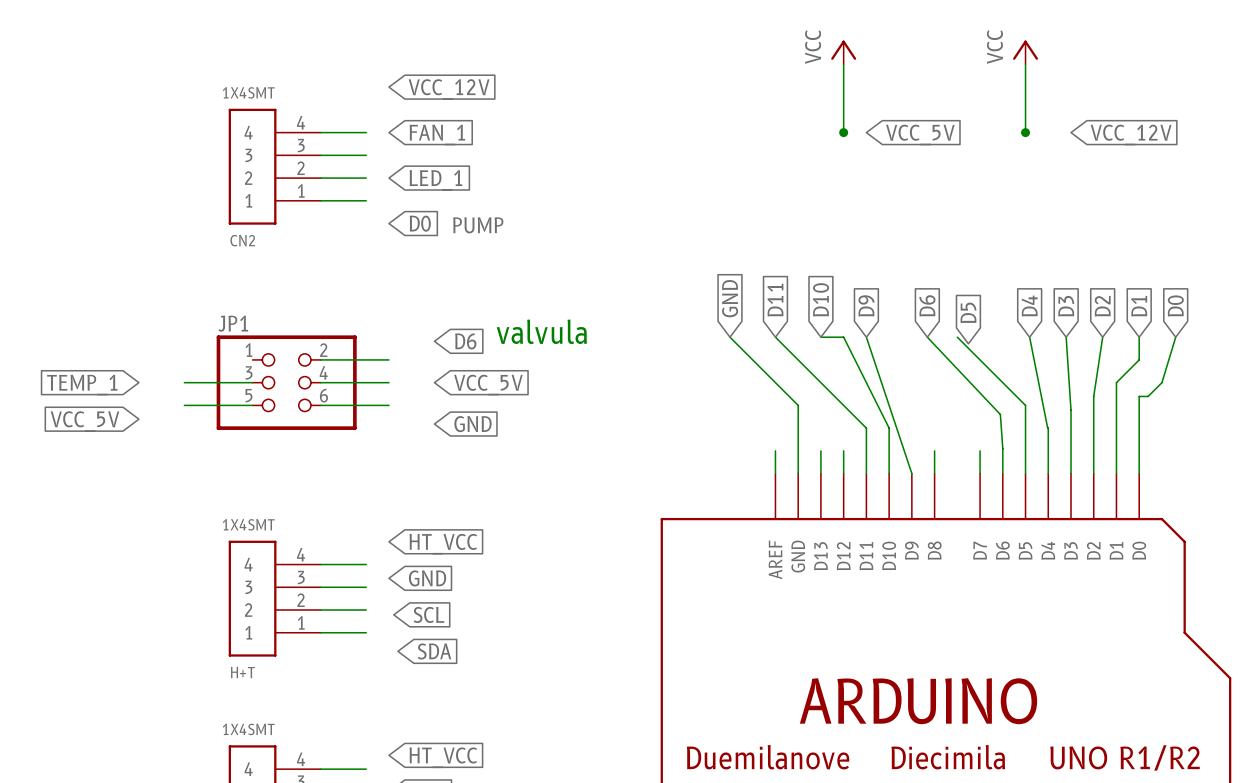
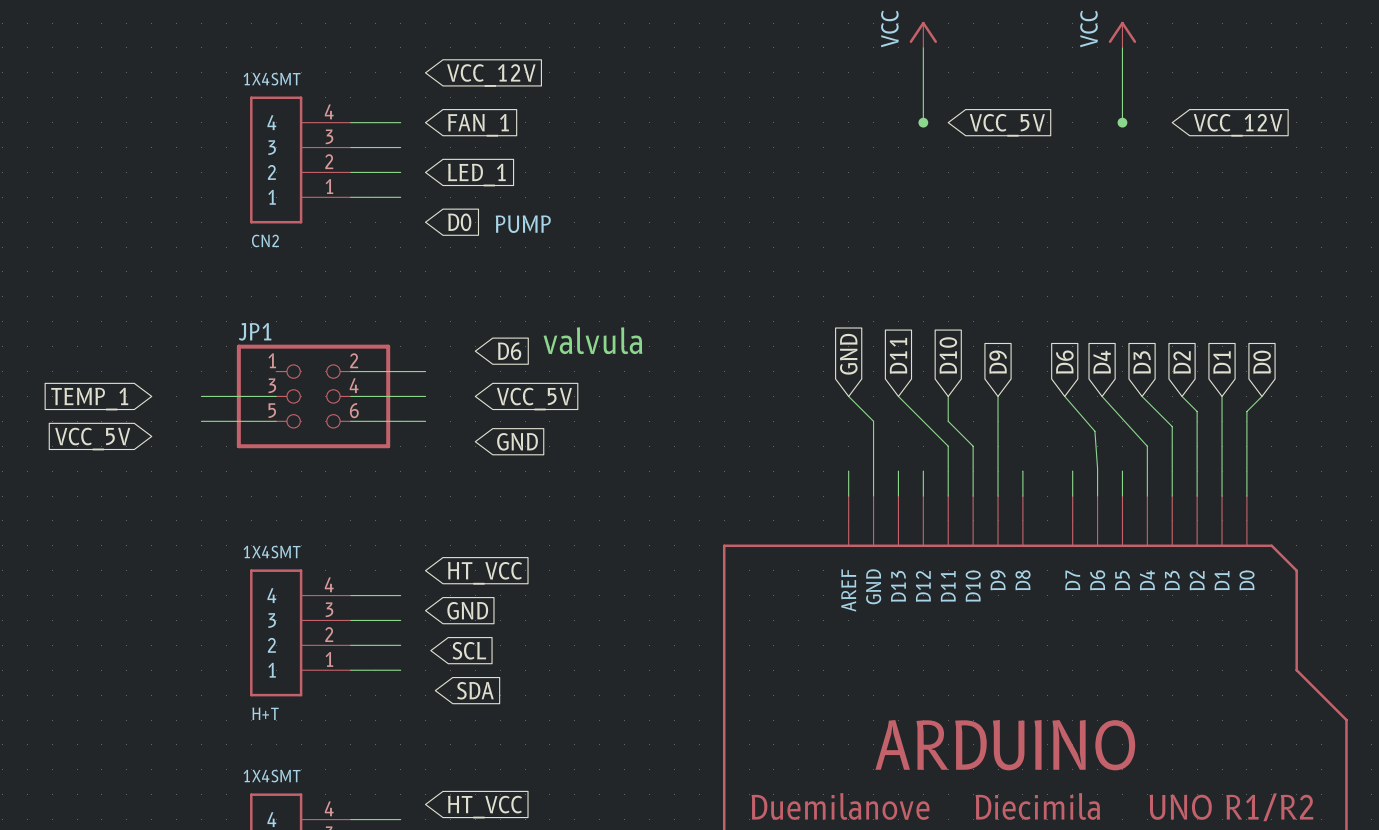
global label position: GND (730, 298) -> GND (848, 354)
global label position: D10 (821, 299) -> D10 (948, 355)
global label position: D11 (775, 300) -> D11 (898, 355)
global label position: D9 (866, 305) -> D9 (998, 362)
global label position: D6 (927, 305) -> D6 (1064, 362)
global label position: D0 (1175, 305) -> D0 (1262, 362)
global label position: D4 (1029, 306) -> D4 (1102, 362)
global label position: D3 (1066, 306) -> D3 (1142, 362)
global label position: D2 (1102, 306) -> D2 (1182, 362)
global label position: D1 (1139, 306) -> D1 (1222, 362)
global label: D5 (968, 312) -> none
wire: (729, 337) (775, 382) -> none
wire: (775, 337) (820, 382) -> none
wire: (820, 337) (843, 337) (889, 428) -> (948, 396) (948, 421) (973, 446)
wire: (866, 337) (911, 473) -> (998, 396) (998, 496)
wire: (927, 337) (1000, 414) -> (1064, 396) (1094, 431)
wire: (957, 337) (1025, 405) (1025, 450) -> none
wire: (1029, 337) (1047, 427) -> (1102, 396) (1146, 445)
wire: (1066, 337) (1071, 410) -> (1142, 396) (1172, 426)
wire: (1102, 337) (1093, 396) -> (1182, 396) (1197, 411)
wire: (1139, 337) (1139, 359) (1116, 382) -> none
wire: (1175, 337) (1161, 382) (1148, 396) (1139, 396) -> (1262, 396) (1246, 411)

